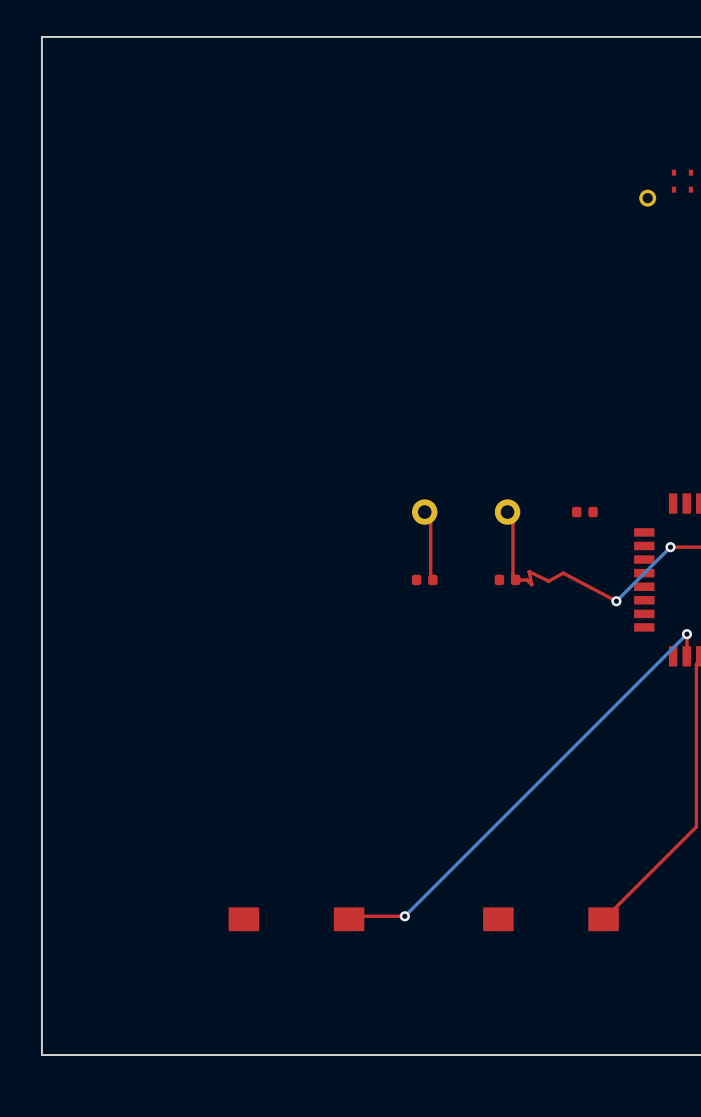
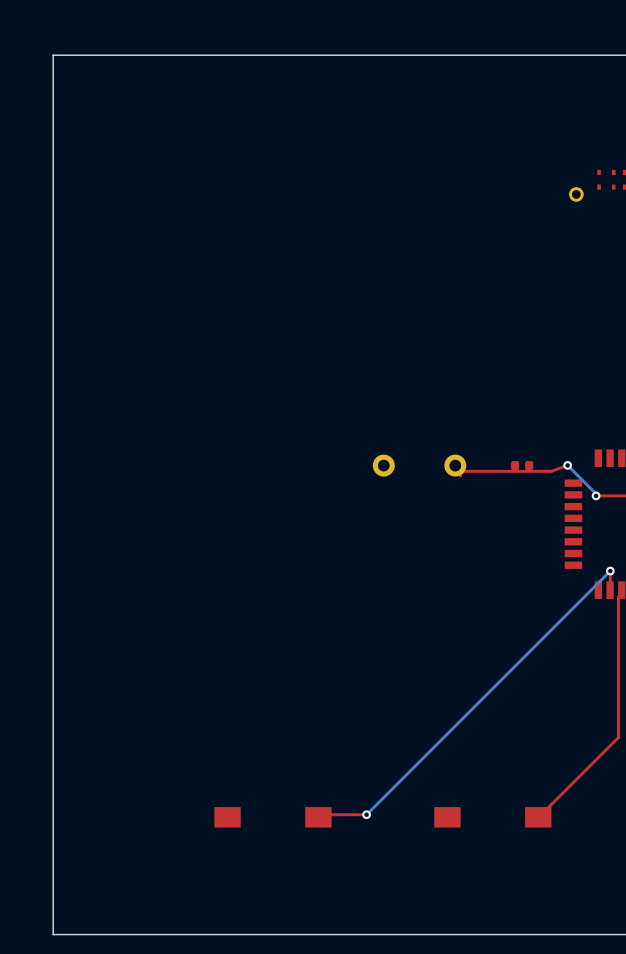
bottom track: none -> (567, 465) (596, 493)
top track: (424, 512) (430, 523) (430, 575) (432, 579) -> none
top track: (507, 512) (512, 523) (512, 575) (515, 579) (527, 580) (531, 584) (529, 571) (548, 581) (563, 573) (616, 601) -> (455, 465) (460, 475) (460, 471) (551, 471) (567, 465)
bottom track: (670, 547) (616, 601) -> none
part: (424, 579) -> none
part: (507, 579) -> none
via position: (616, 601) -> (567, 465)

